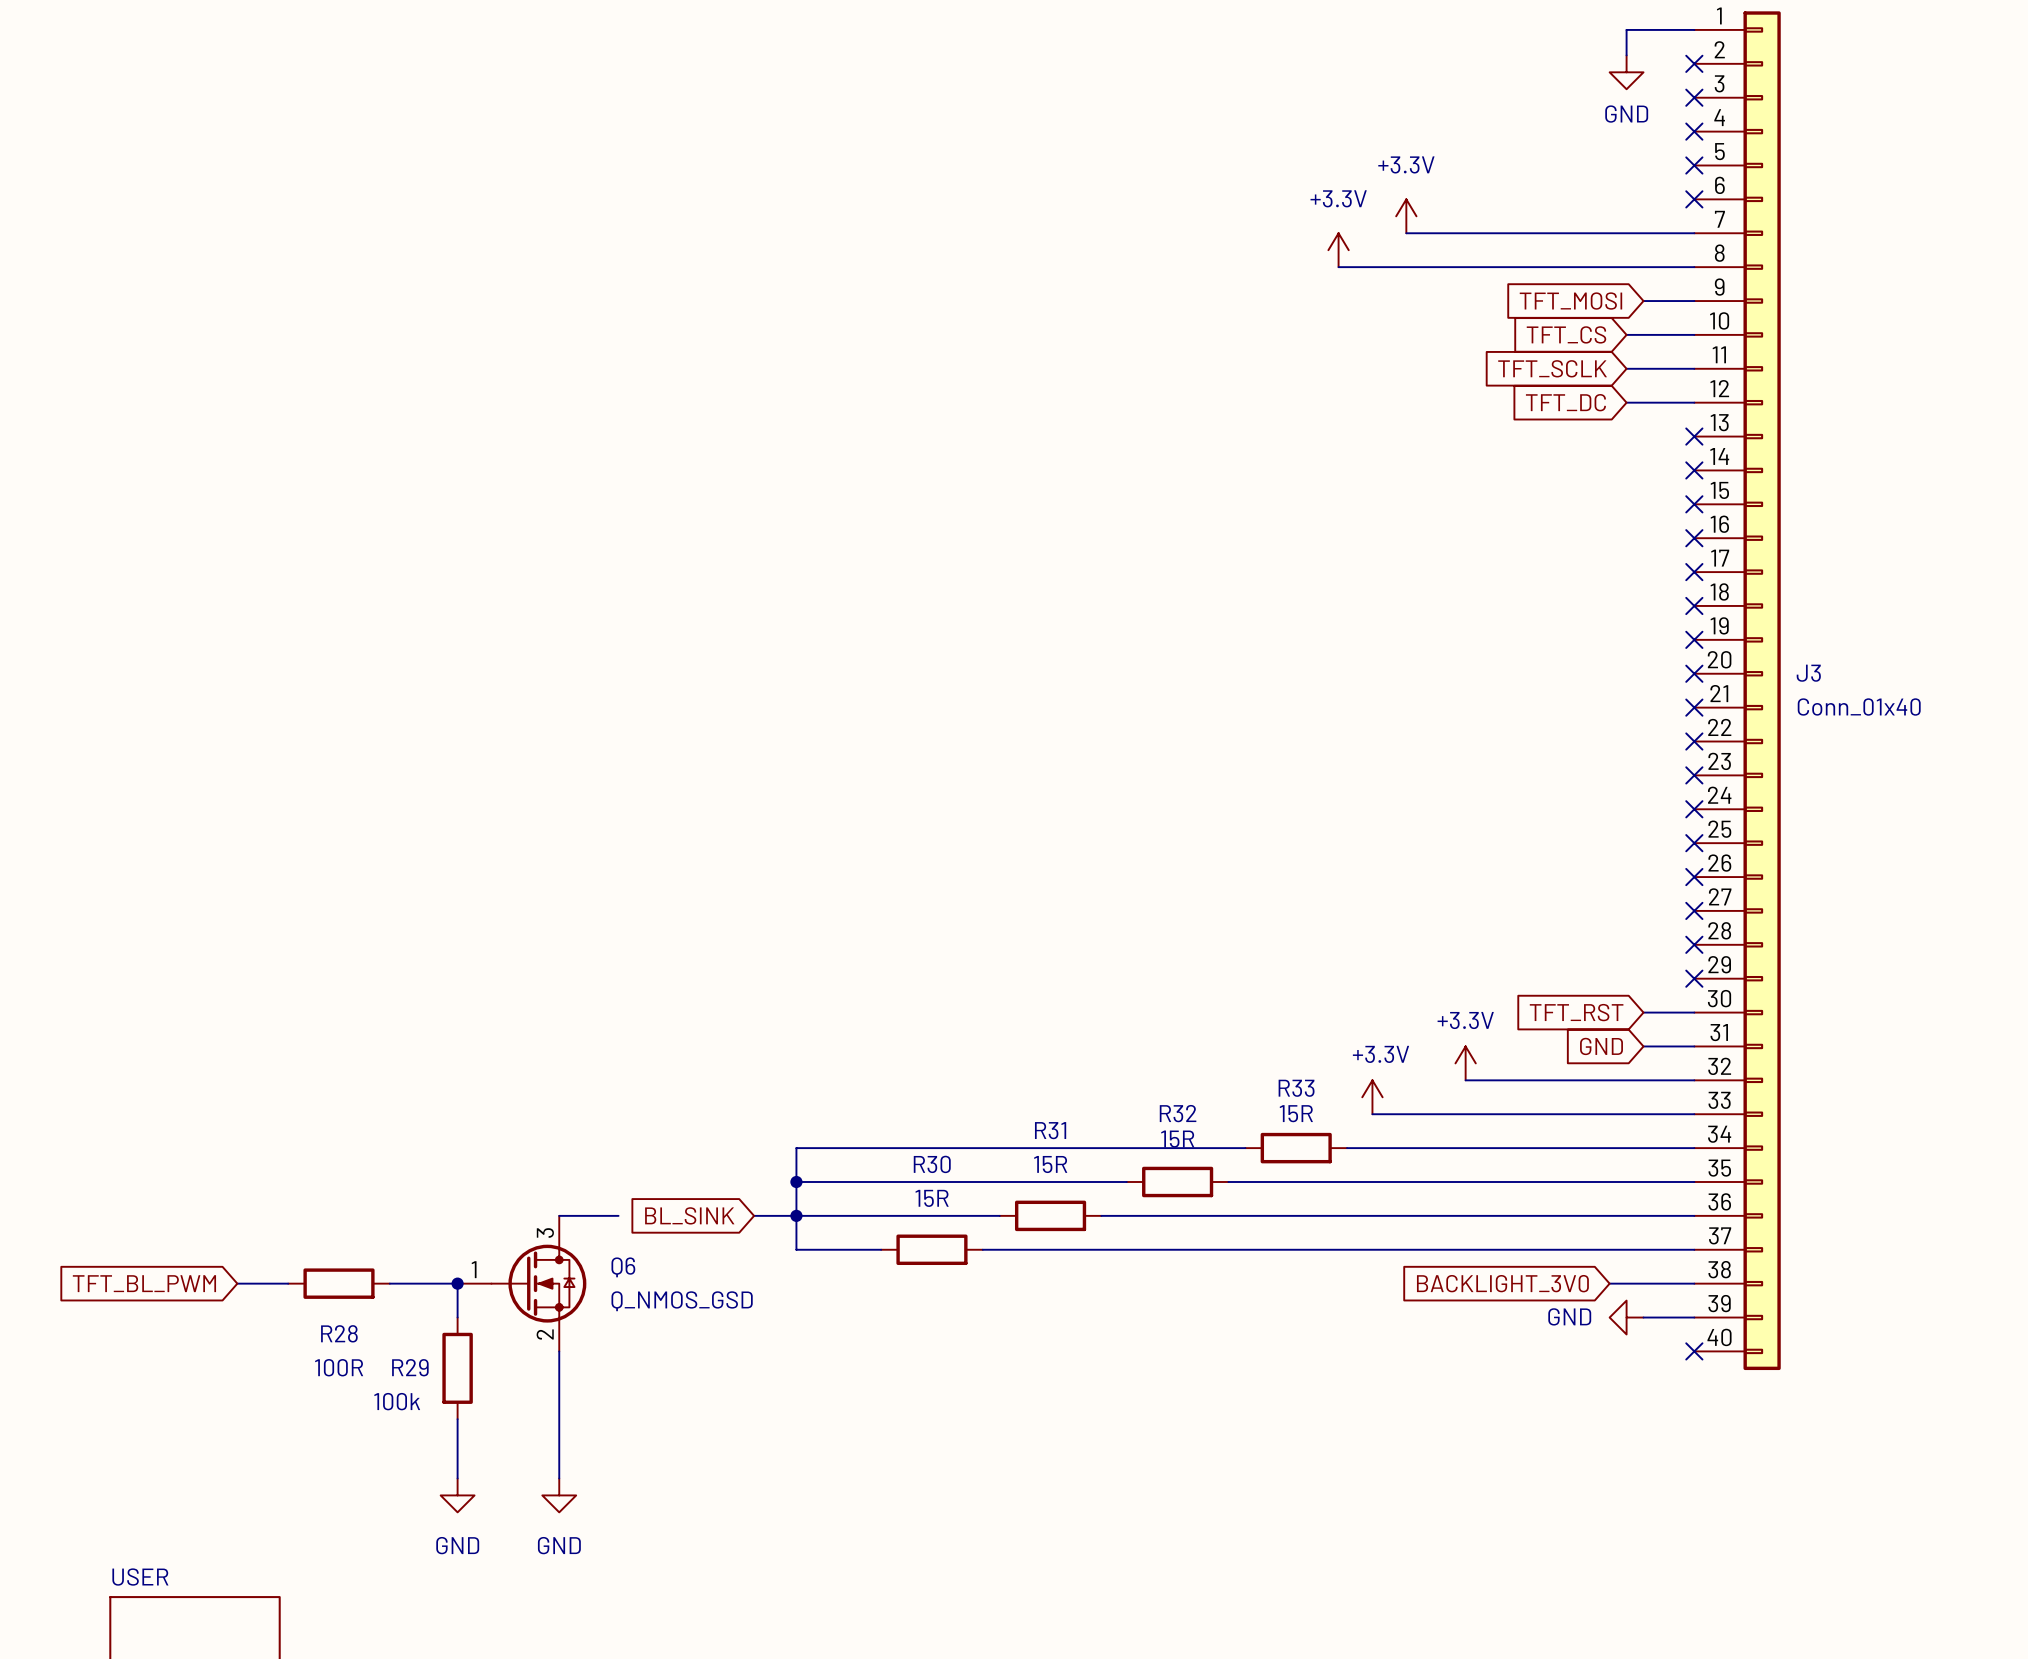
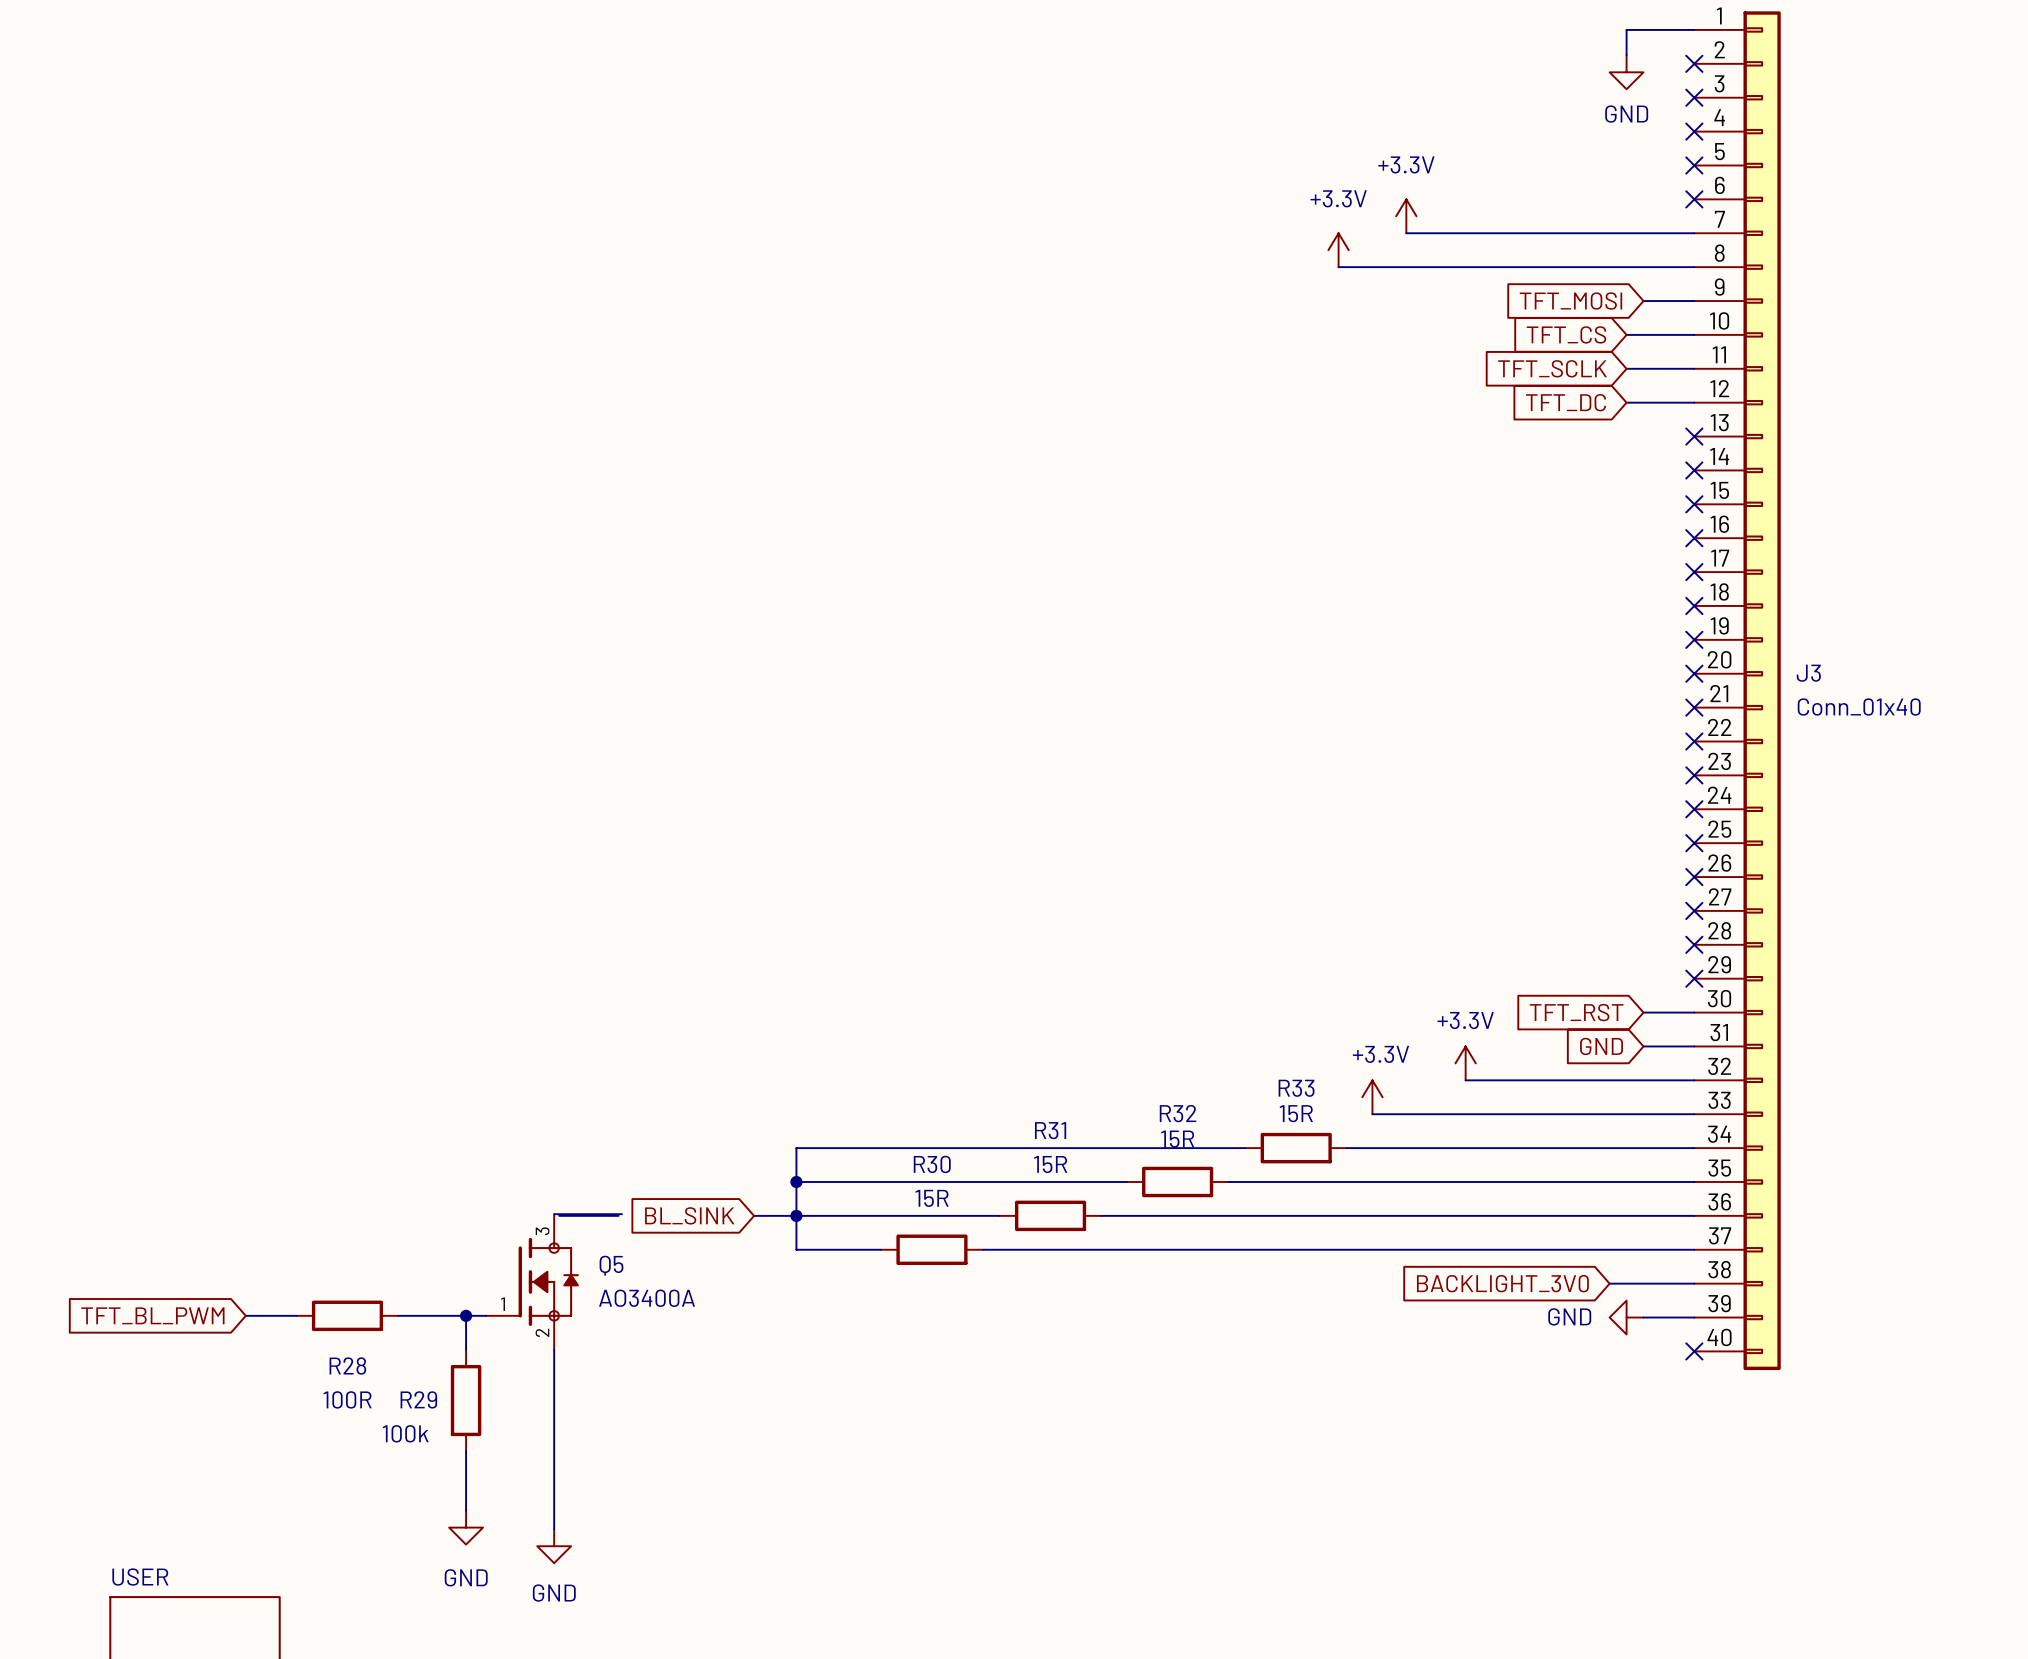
wire: none -> (554, 1214) (621, 1214)
Q5: none -> AO3400A (532, 1281)
global label position: TFT_BL_PWM (144, 1283) -> TFT_BL_PWM (152, 1315)
wire: (237, 1283) (288, 1283) -> (245, 1315) (296, 1315)
R28 position: (339, 1283) -> (347, 1315)
wire: (389, 1283) (457, 1283) (457, 1317) -> none
junction position: (457, 1283) -> (466, 1315)
Q6: Q_NMOS_GSD (521, 1283) -> none
wire: none -> (398, 1315) (486, 1315)
wire: none -> (466, 1315) (466, 1349)
wire: none -> (554, 1349) (554, 1529)
wire: (559, 1351) (559, 1478) -> none
R29 position: (457, 1368) -> (466, 1400)
wire: (457, 1419) (457, 1478) -> (466, 1451) (466, 1510)
power symbol position: GND (457, 1495) -> GND (466, 1527)
power symbol: GND (559, 1495) -> none
power symbol: none -> GND (554, 1546)

